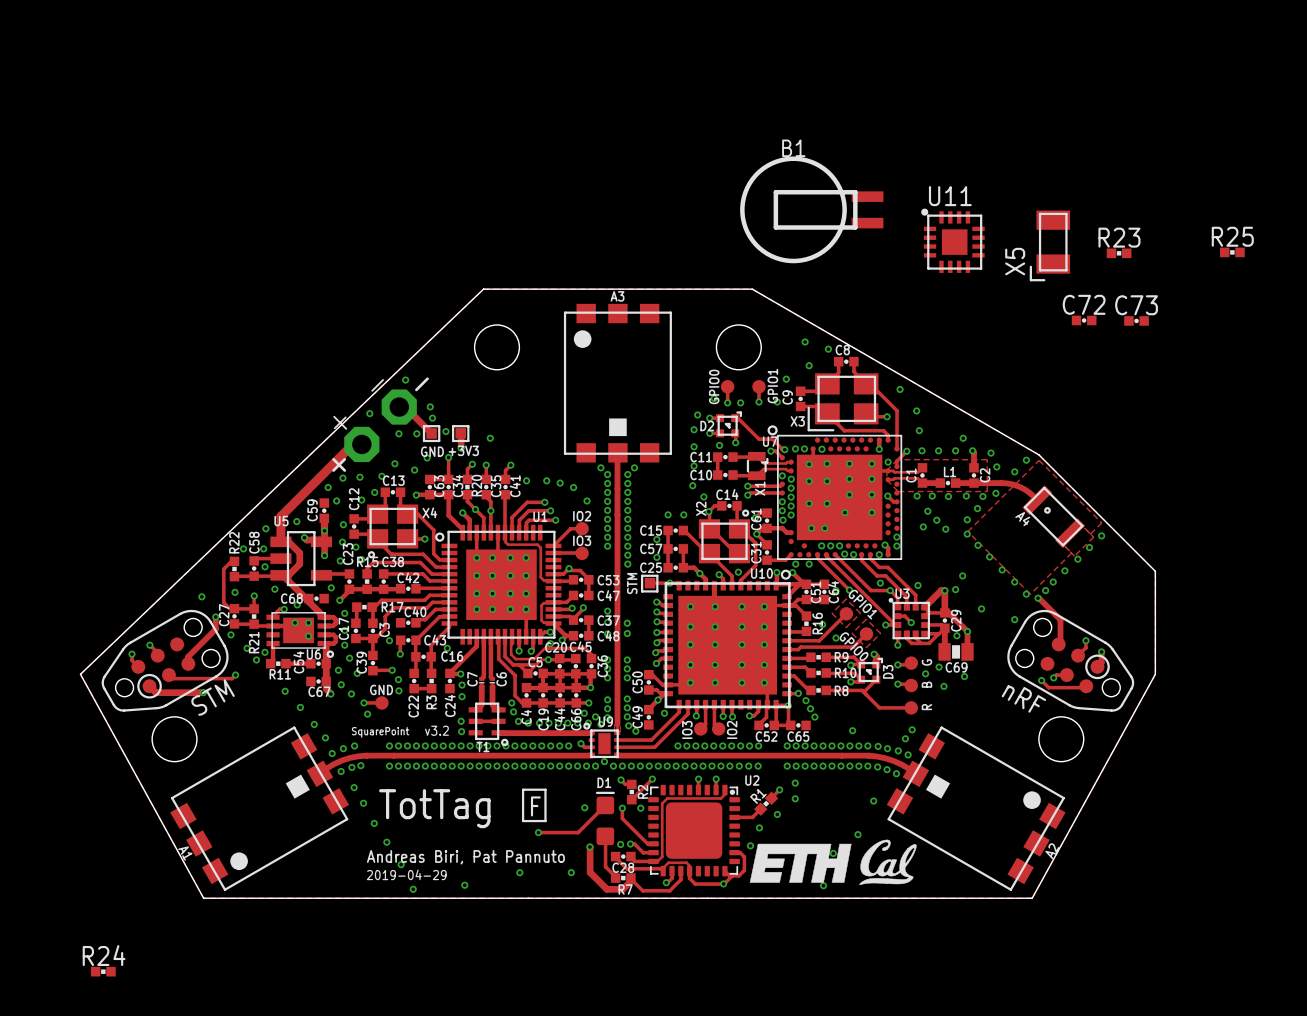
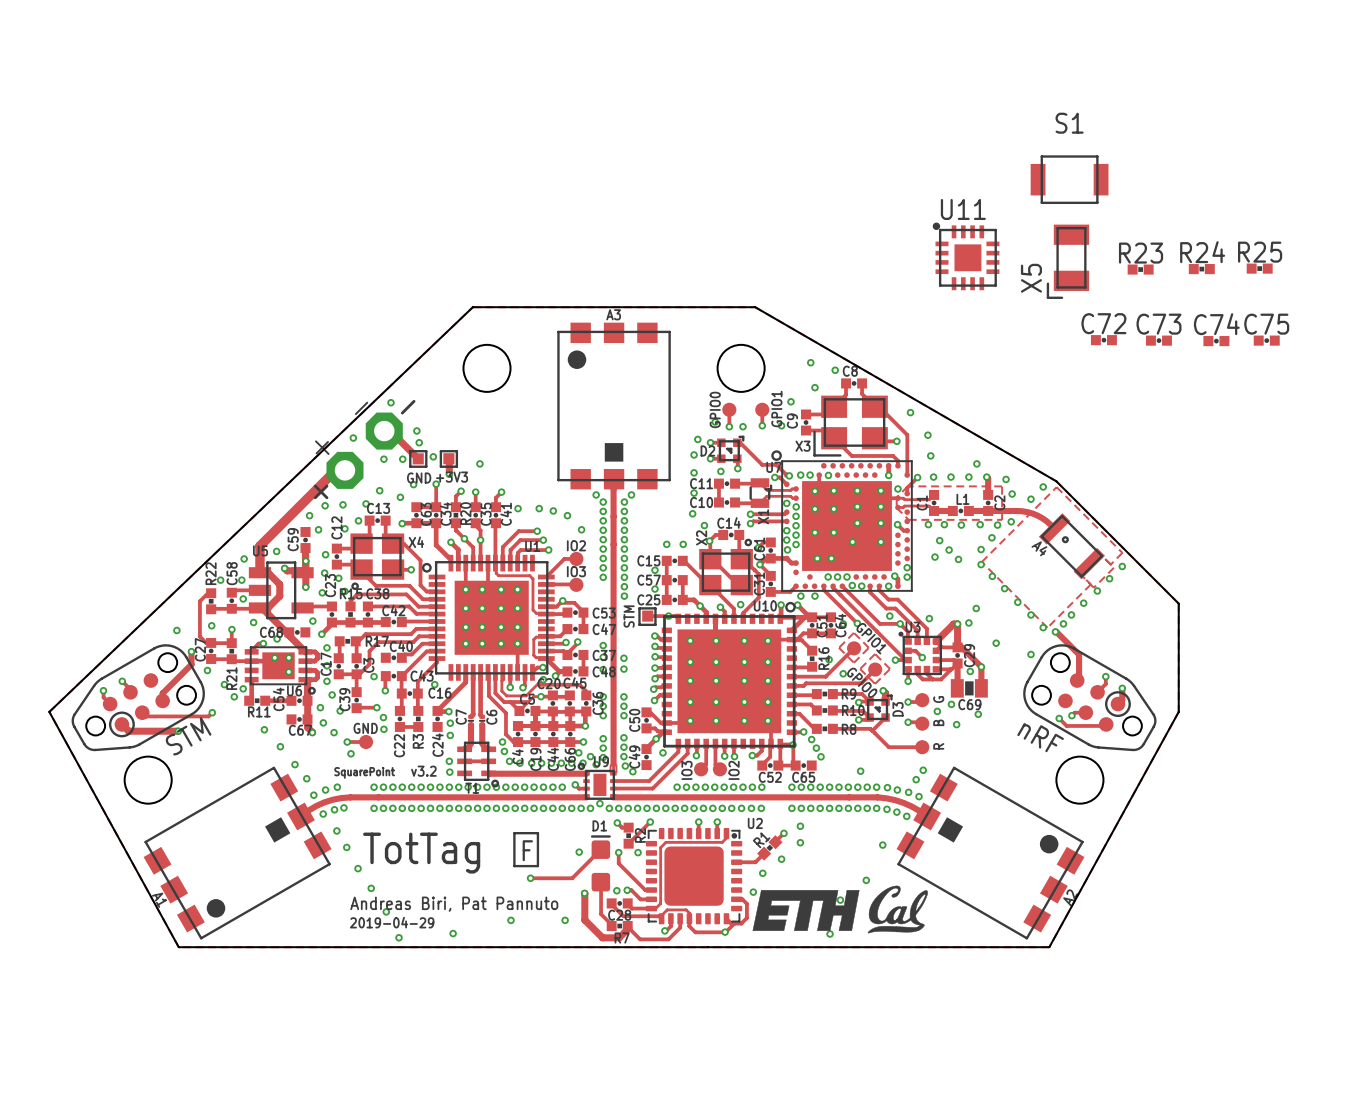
S1: none -> (1069, 179)
B1: (811, 209) -> none
C75: none -> (1266, 340)
C74: none -> (1216, 341)
R24 position: (103, 971) -> (1201, 269)

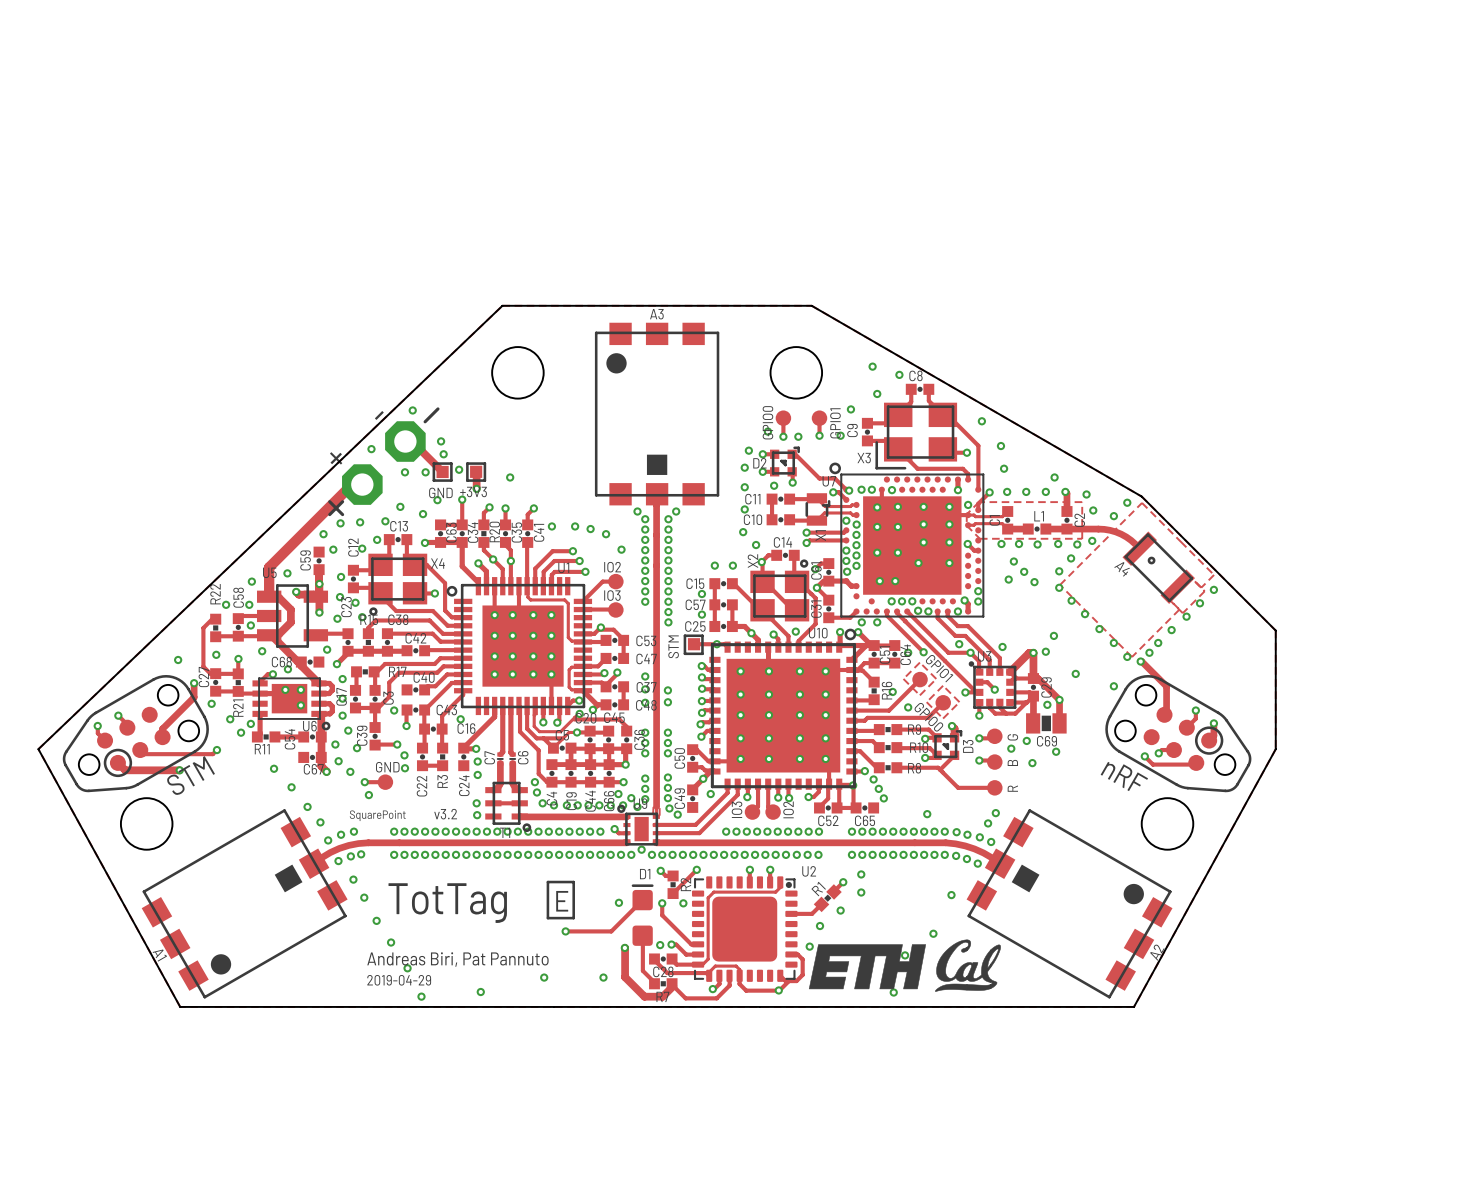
S1: (1069, 179) -> none
U11: (966, 256) -> none
X5: (1067, 261) -> none
R25: (1259, 268) -> none
R23: (1140, 269) -> none
R24: (1201, 269) -> none
C72: (1103, 340) -> none
C73: (1158, 340) -> none
C75: (1266, 340) -> none
C74: (1216, 341) -> none
text: F (527, 850) -> E (562, 901)

